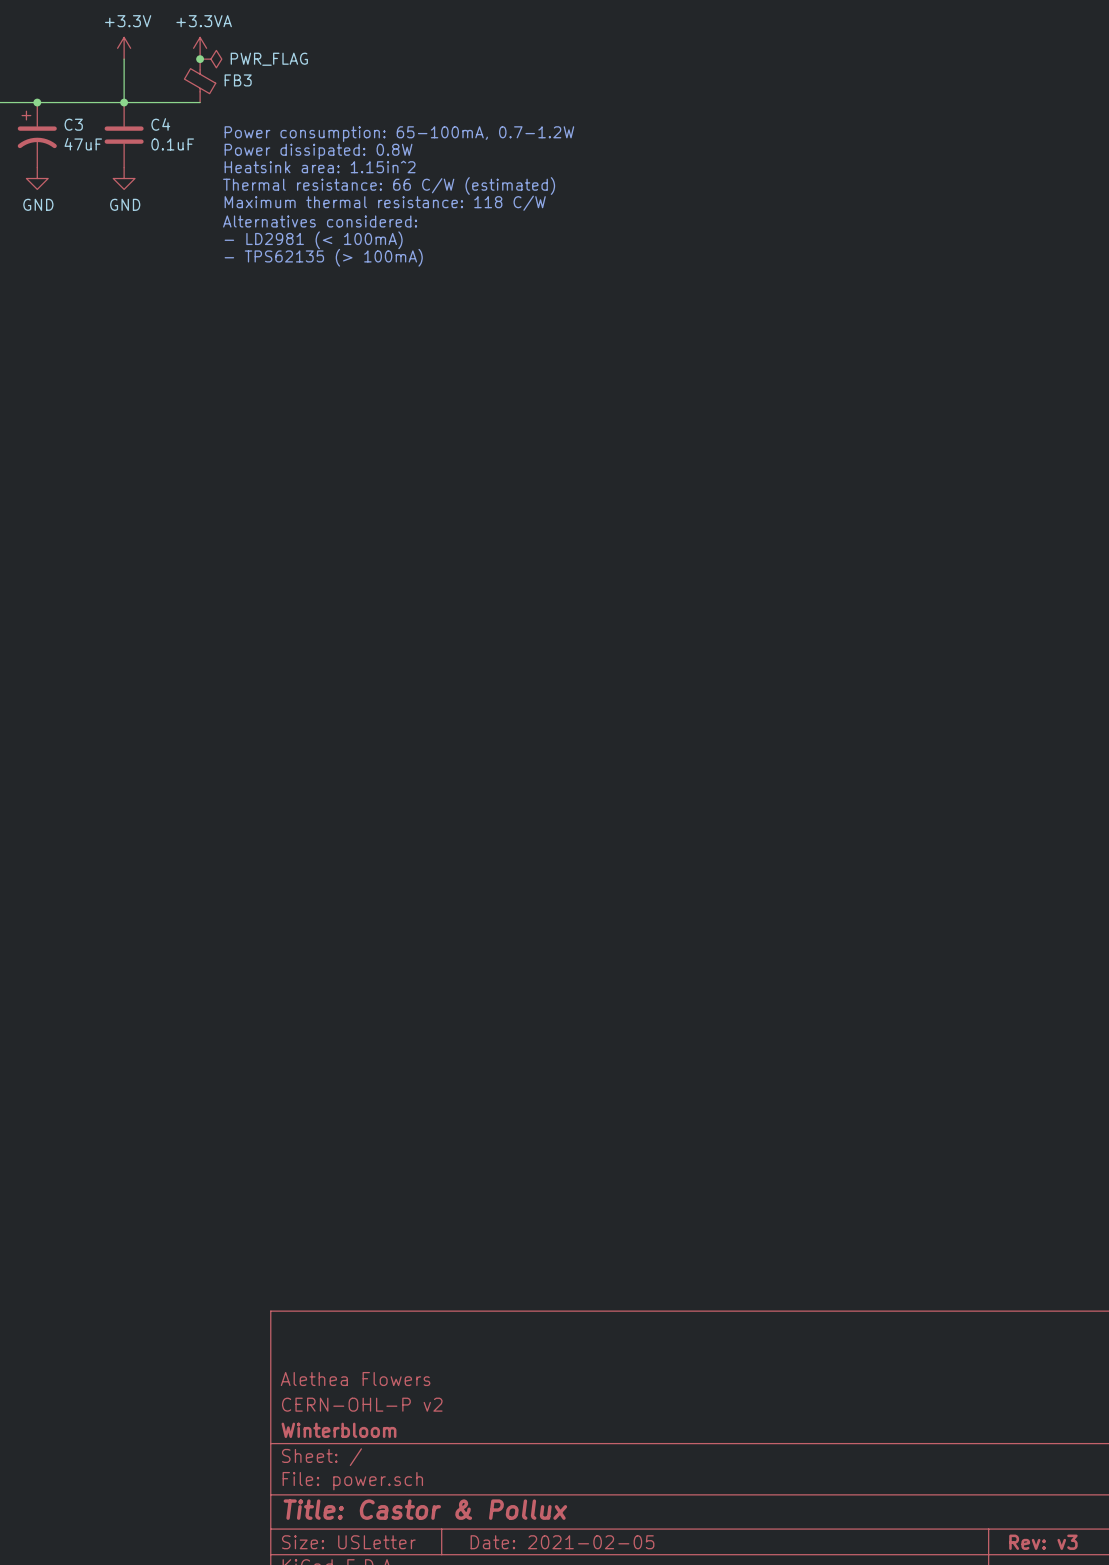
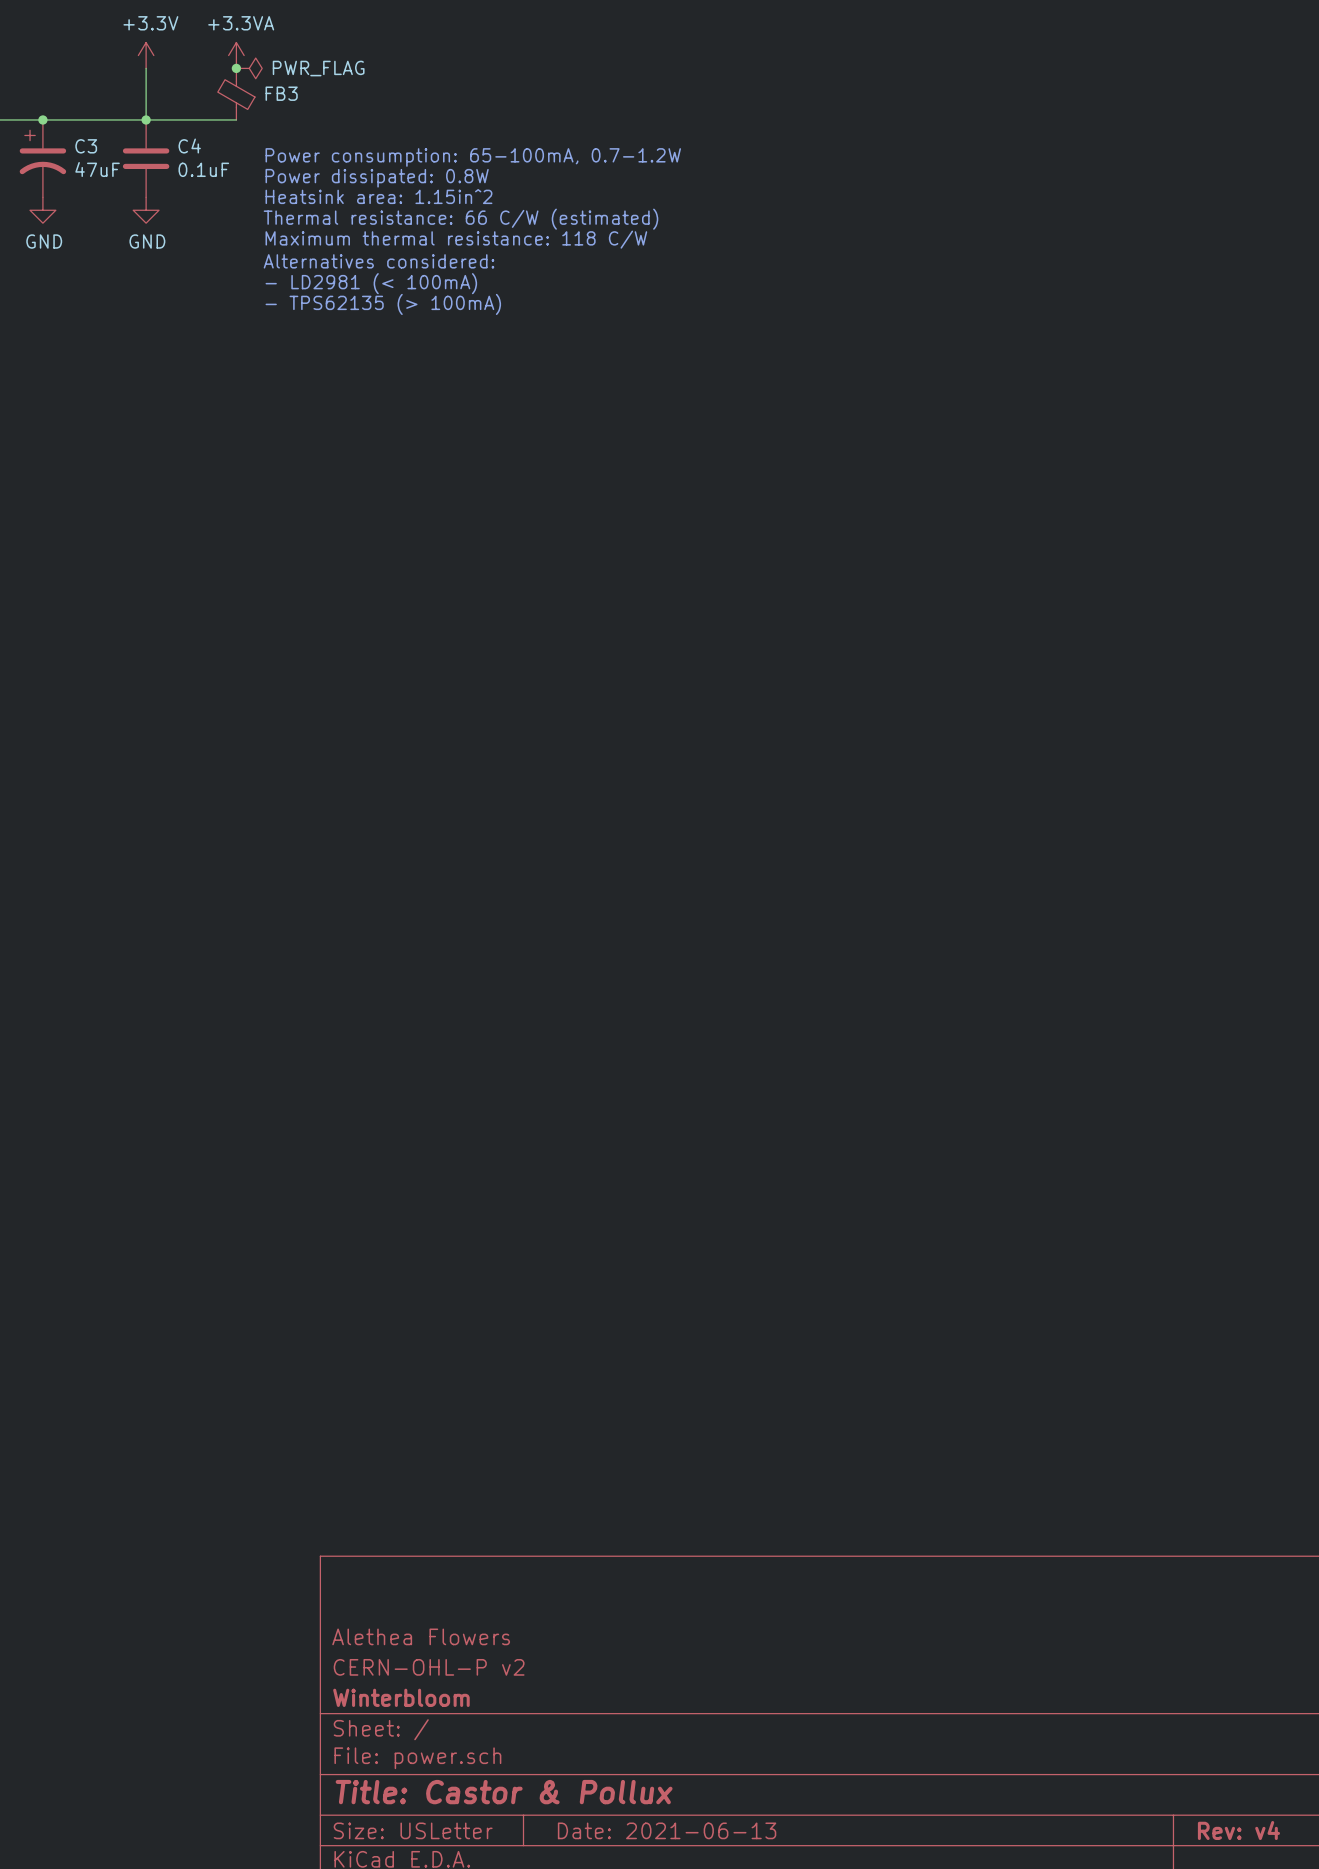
title block: Date: 2021-02-05 (562, 1542) -> Date: 2021-06-13 (667, 1830)
title block: Rev: v3 (1043, 1542) -> Rev: v4 (1238, 1830)

